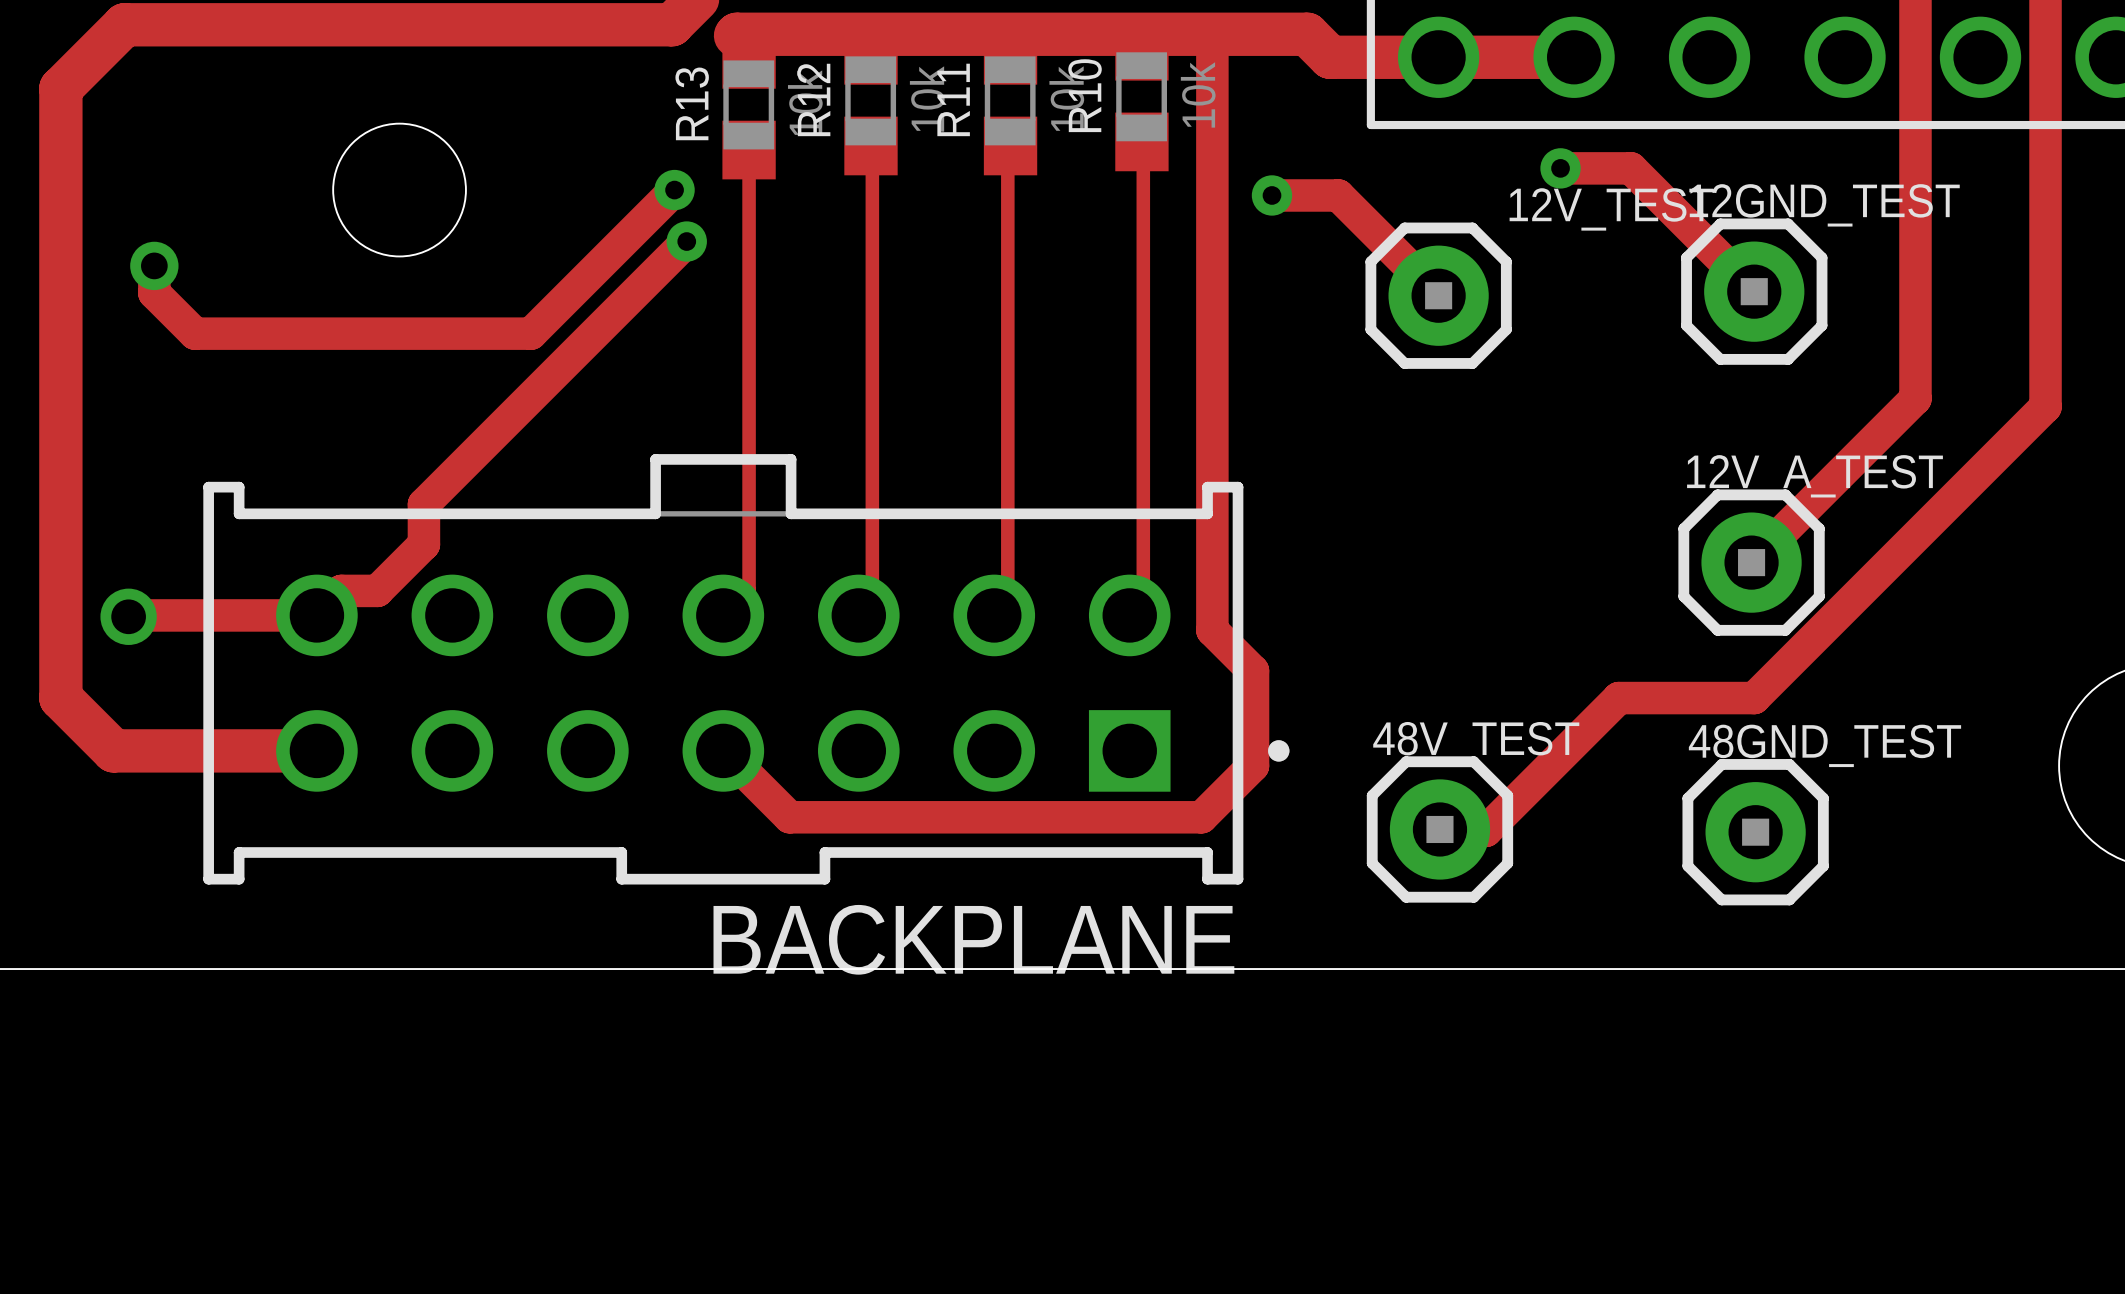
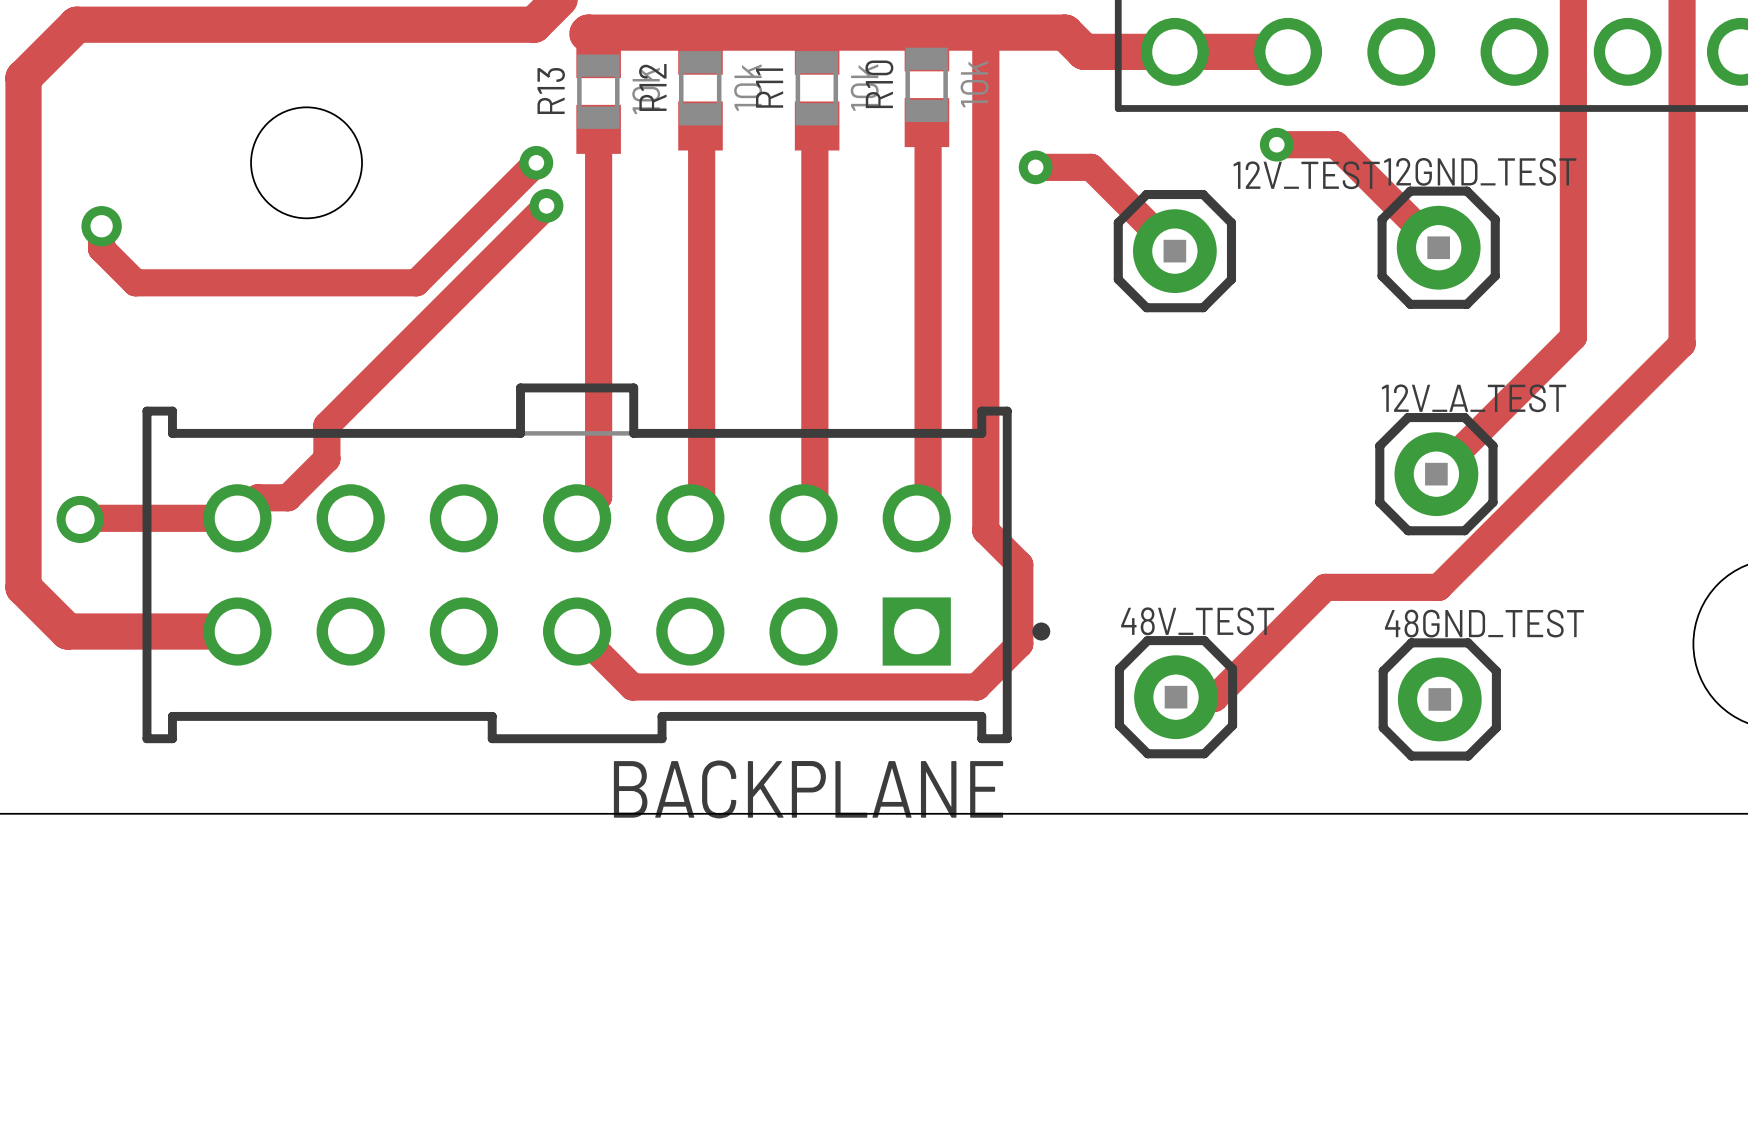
track width: thin (1143, 143) (1143, 601) (1129, 615) -> thick (928, 123) (928, 506) (916, 518)
track width: thin (872, 147) (872, 601) (858, 615) -> thick (701, 127) (701, 506) (690, 518)
track width: thin (1007, 148) (1007, 601) (994, 615) -> thick (814, 128) (814, 506) (803, 518)
track width: thin (749, 150) (749, 589) (723, 615) -> thick (598, 129) (598, 496) (577, 518)

